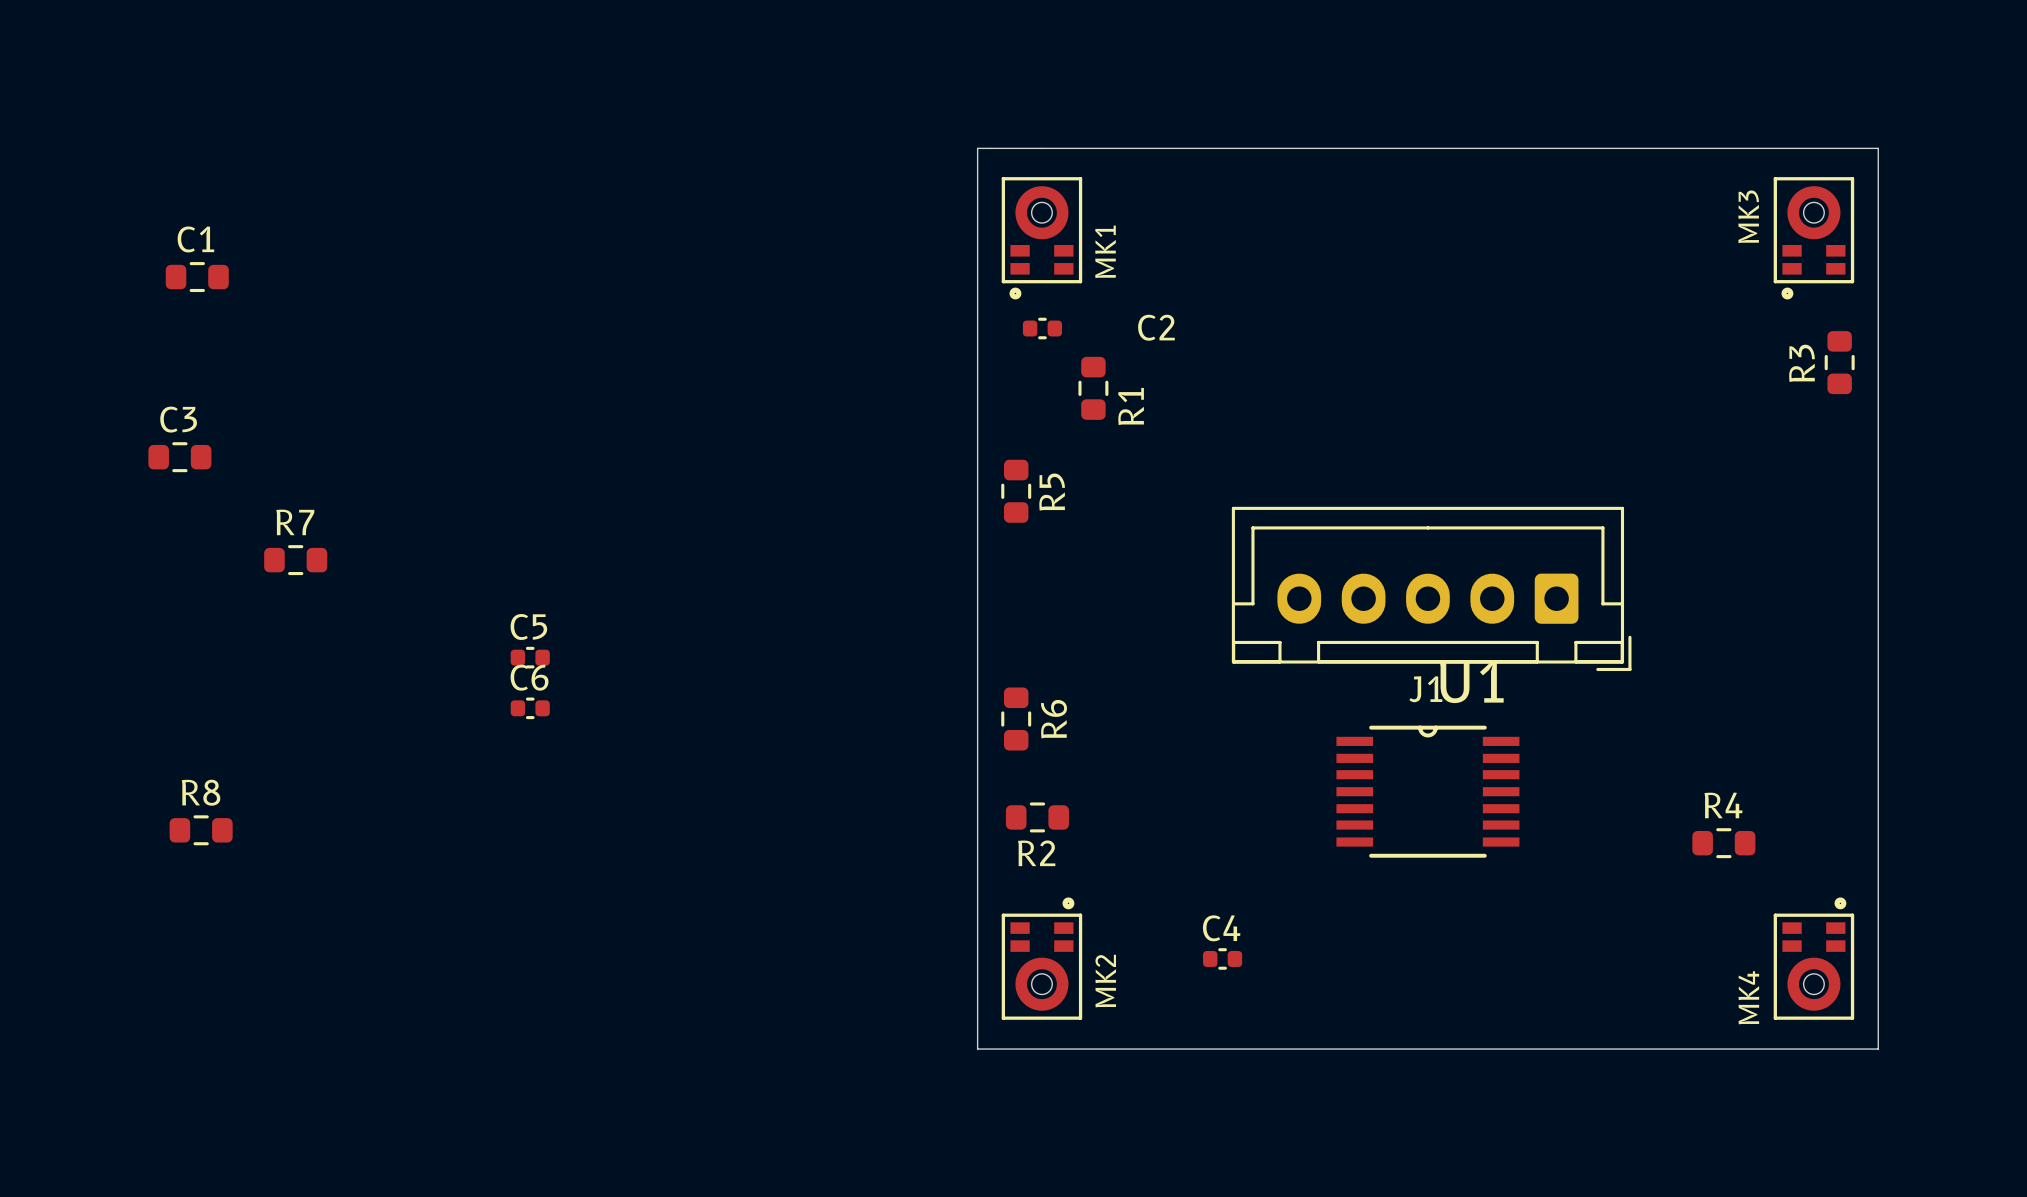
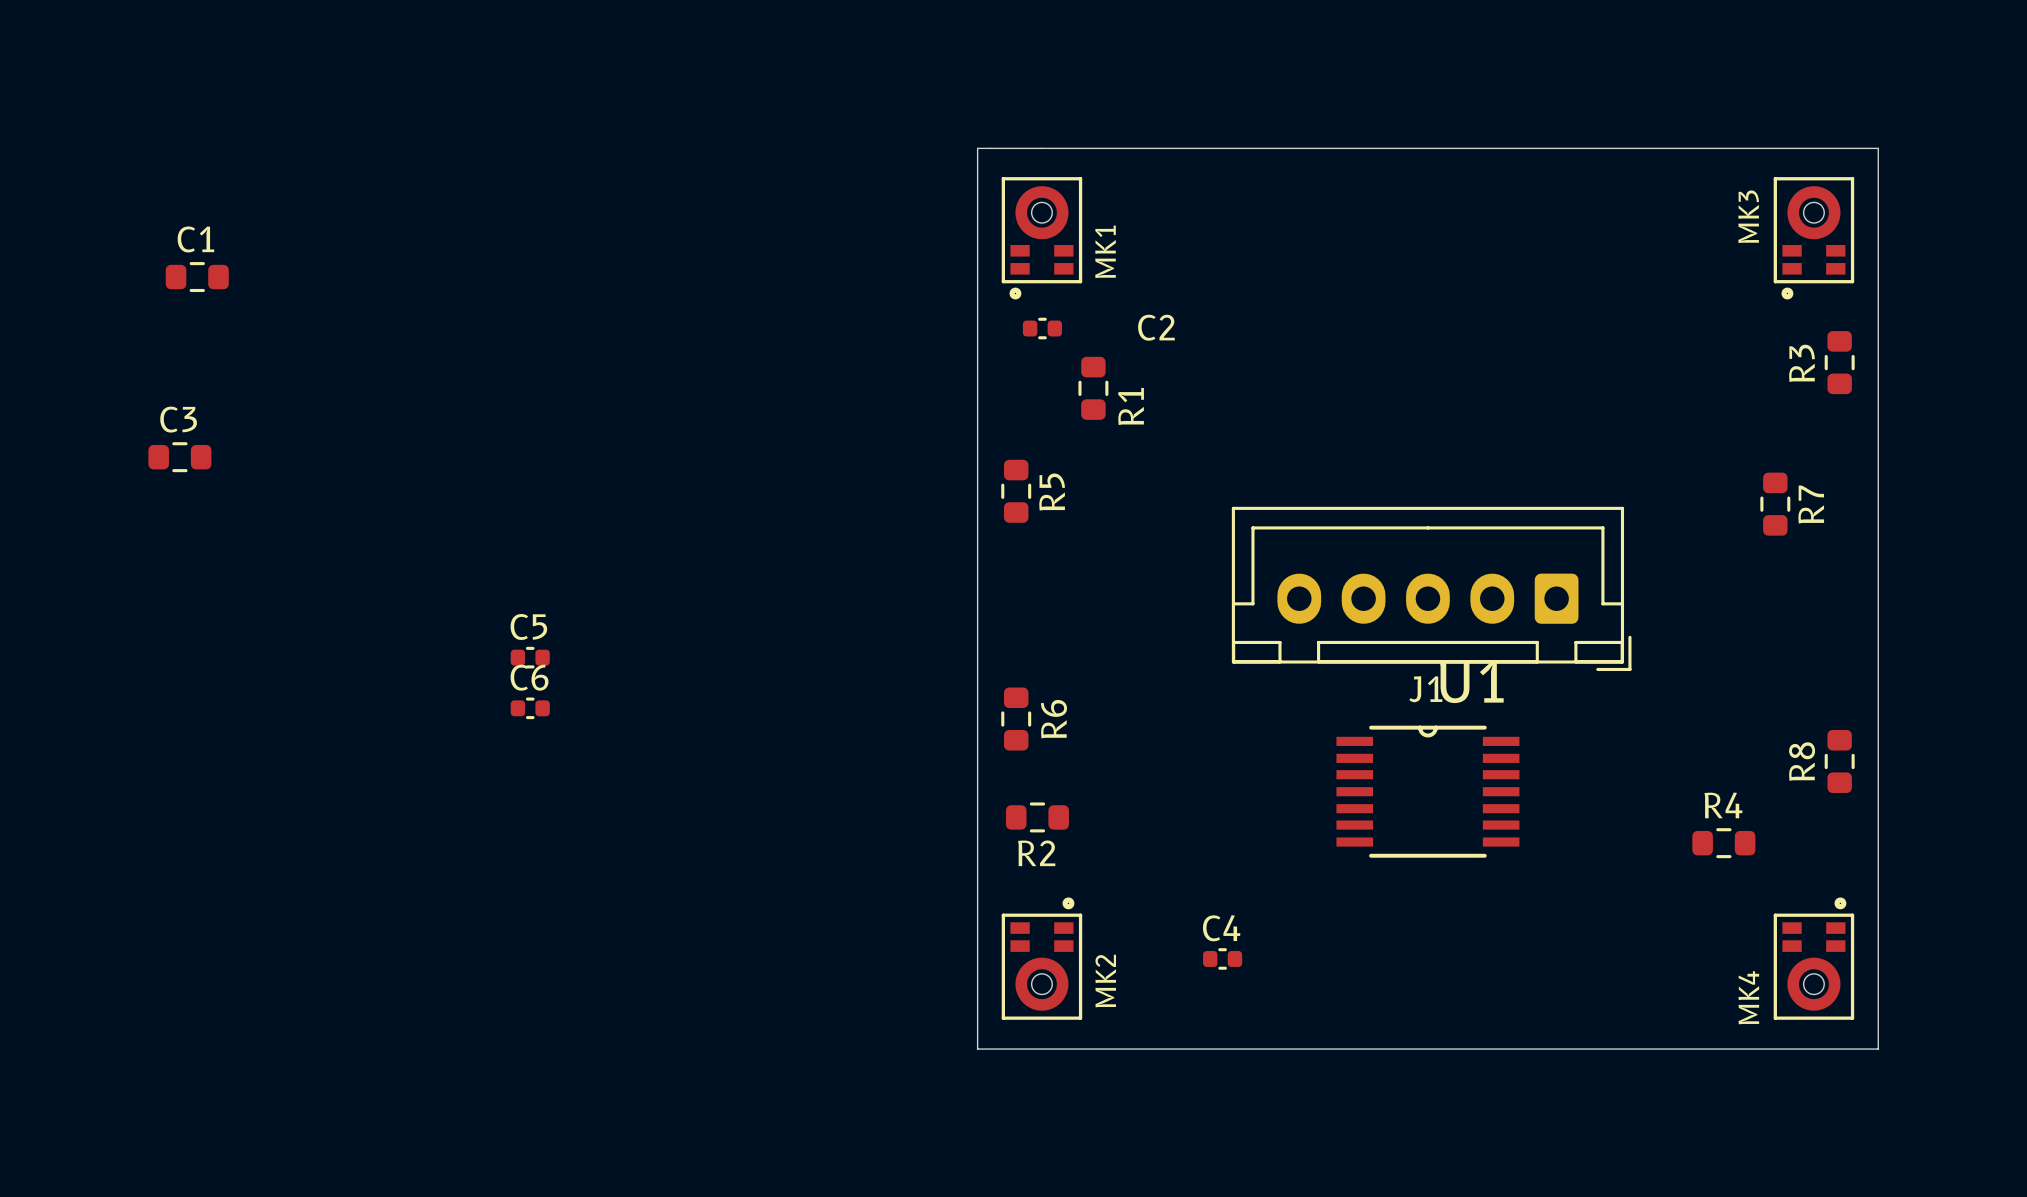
R7 rotation: 0° (295, 560) -> 90° clockwise (1775, 504)
R7 position: (295, 560) -> (1775, 504)
R8 name position: R8 (201, 792) -> R8 (1802, 761)
R8 rotation: 0° (201, 830) -> 90° clockwise (1839, 761)
R8 position: (201, 830) -> (1839, 761)

